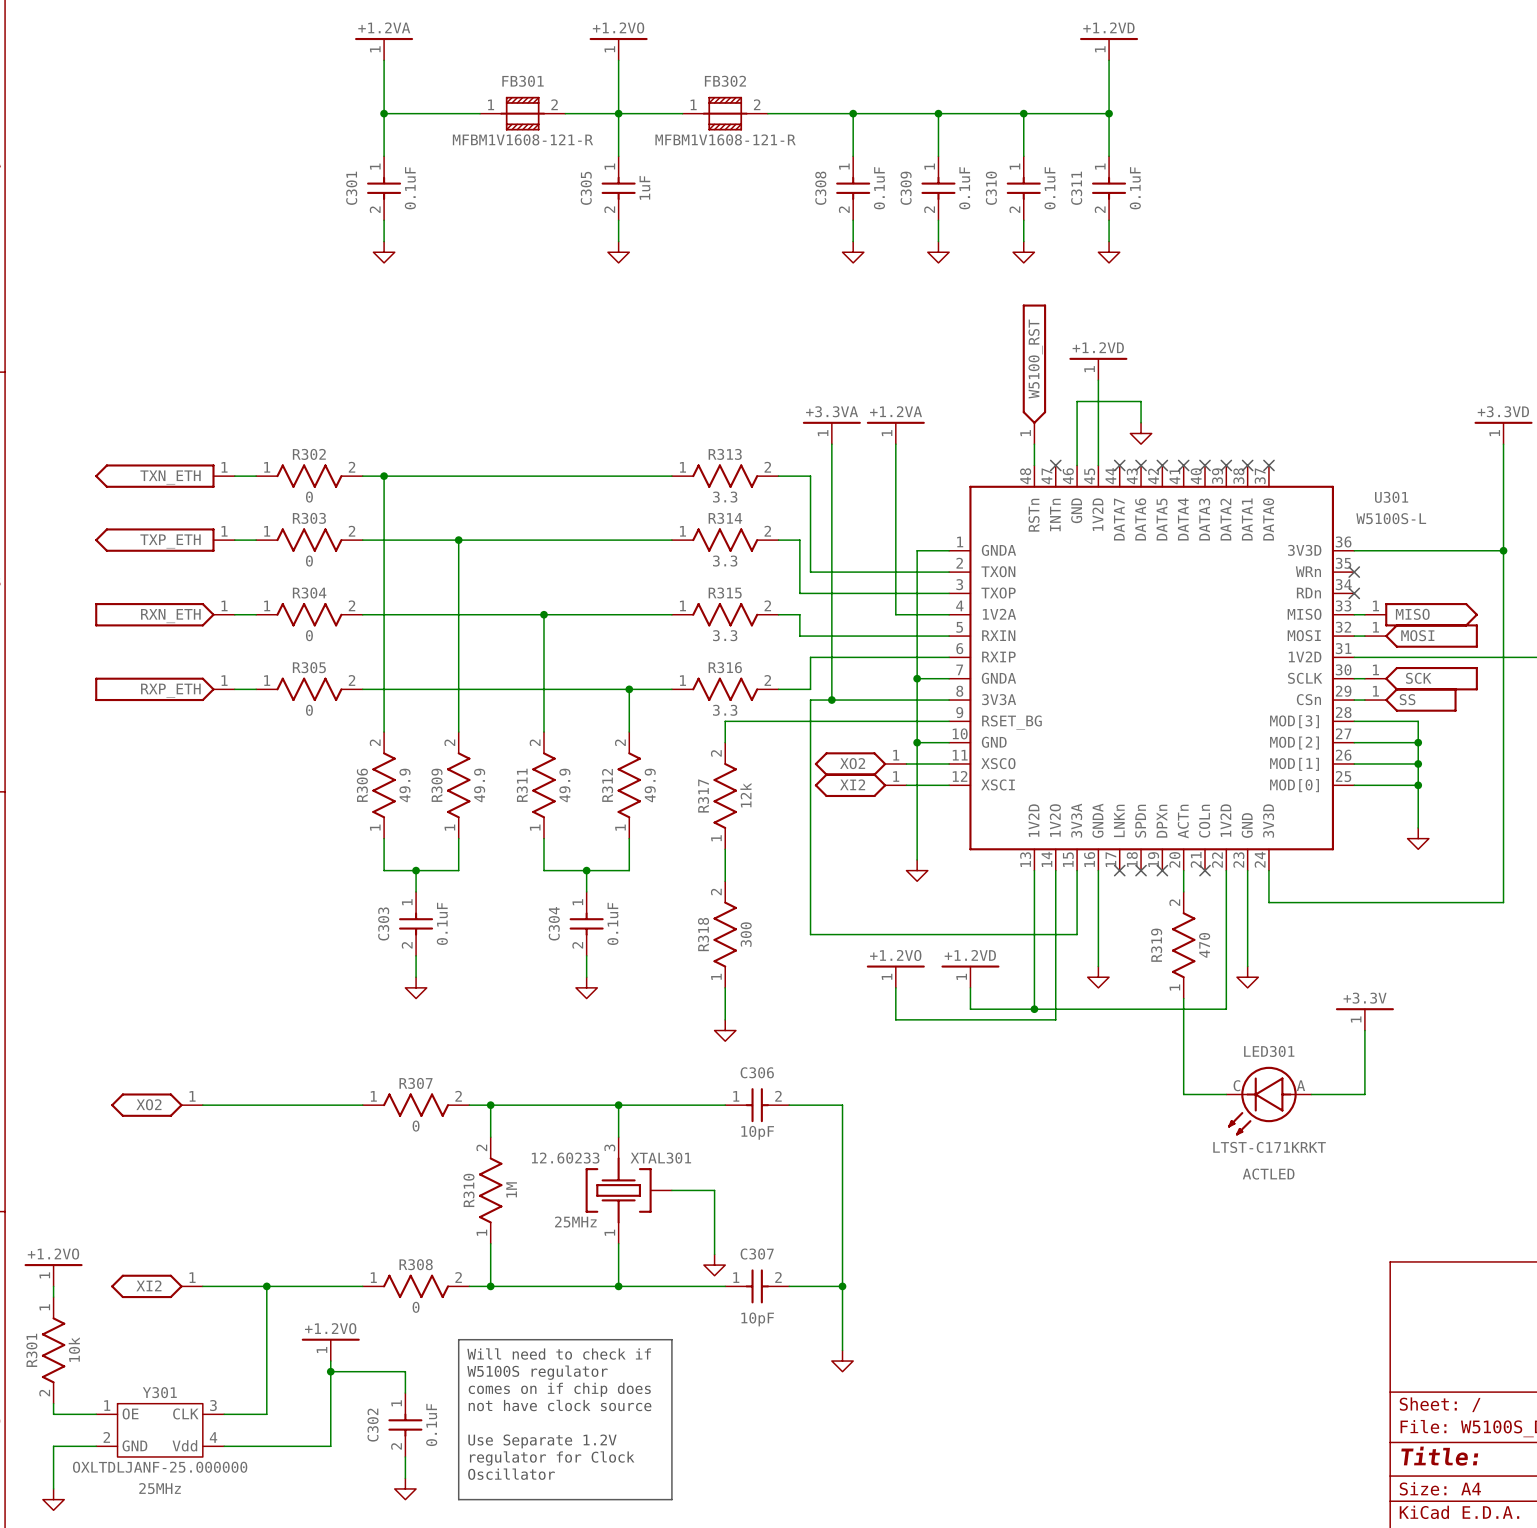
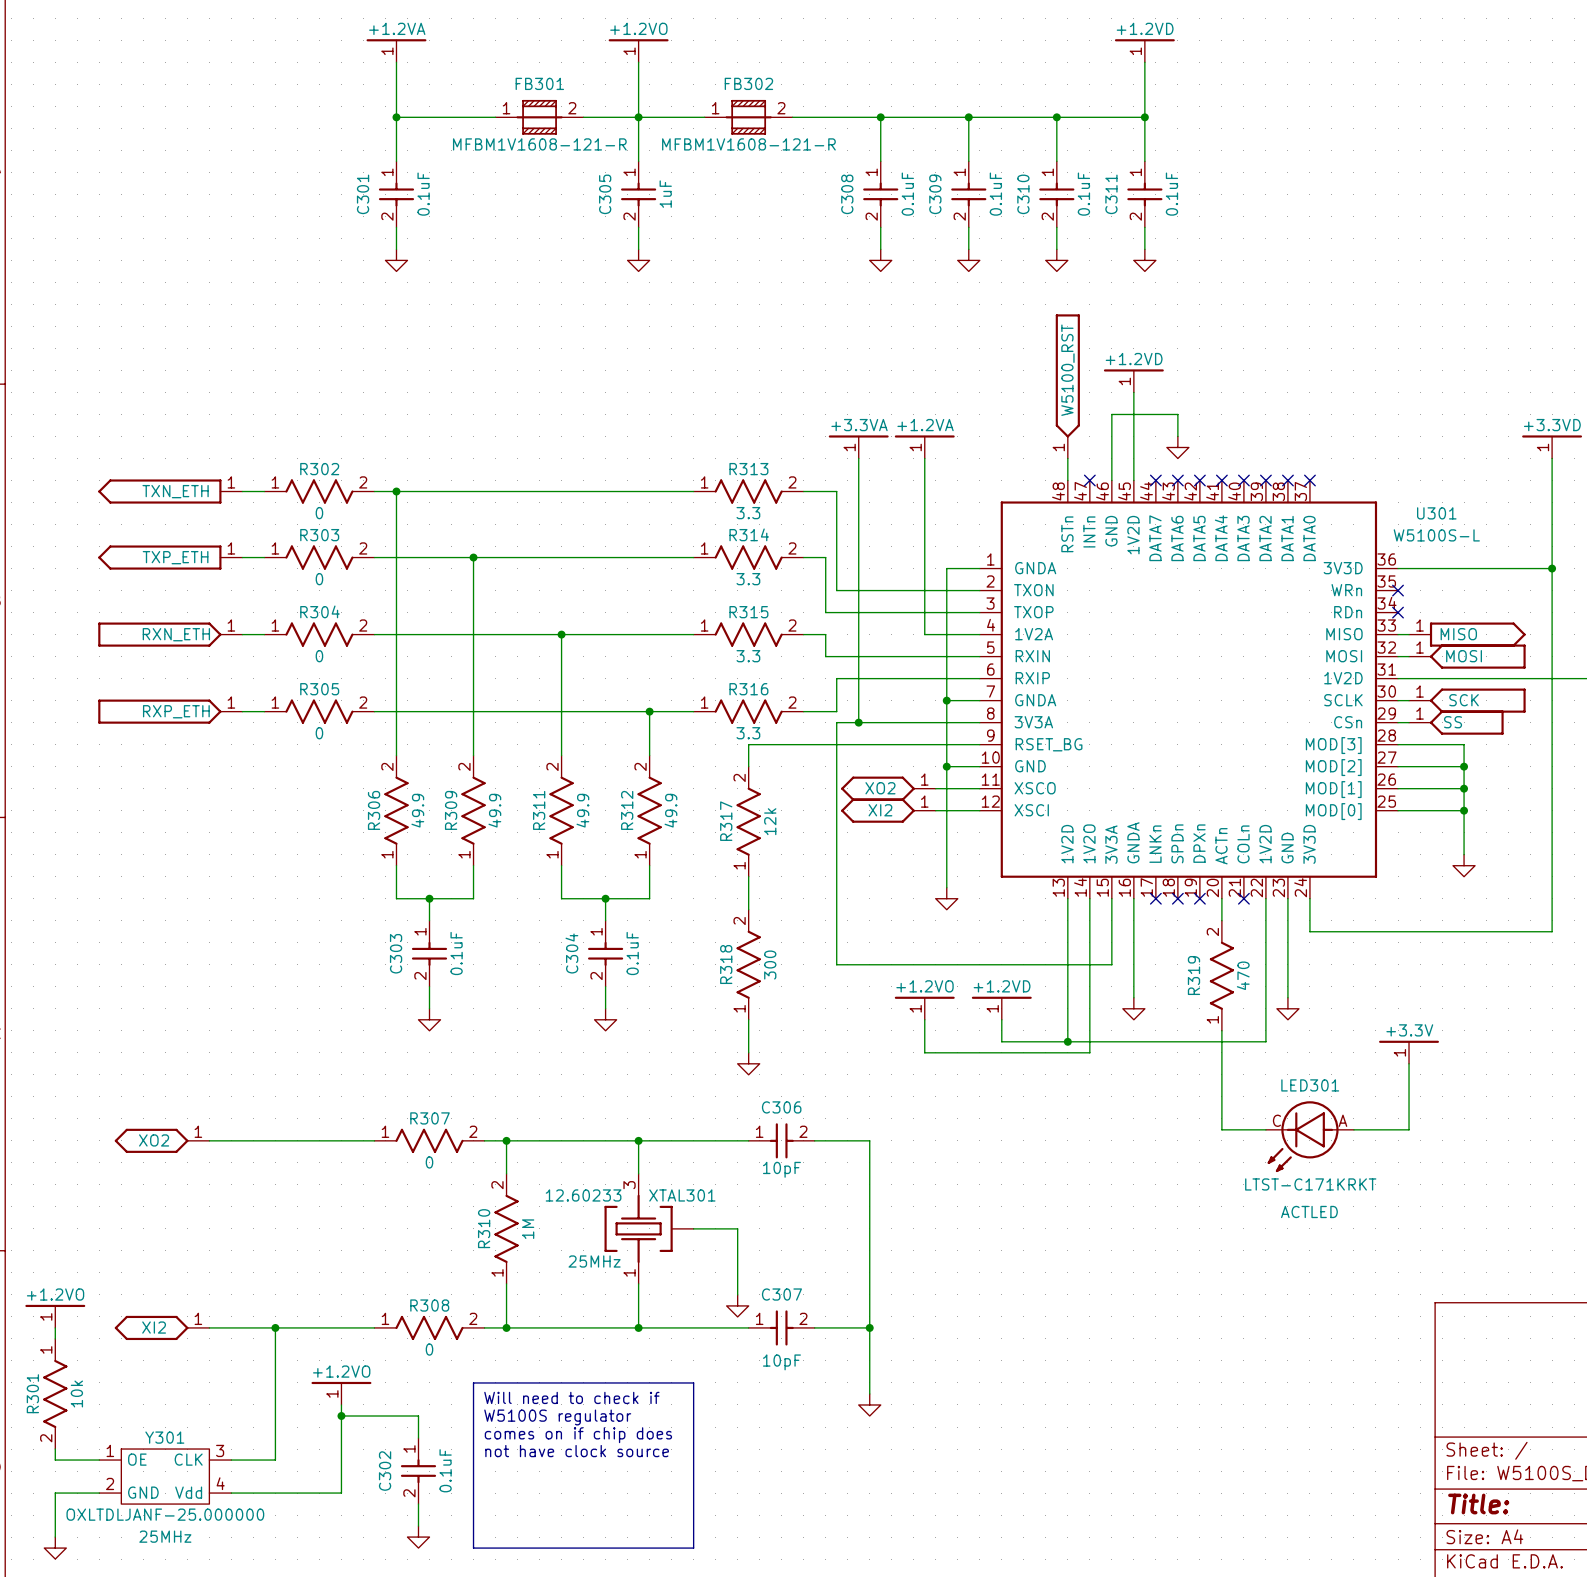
text: Use Separate 1.2V (542, 1441) -> none
text: regulator for Clock (552, 1458) -> none
text: Oscillator (511, 1474) -> none

